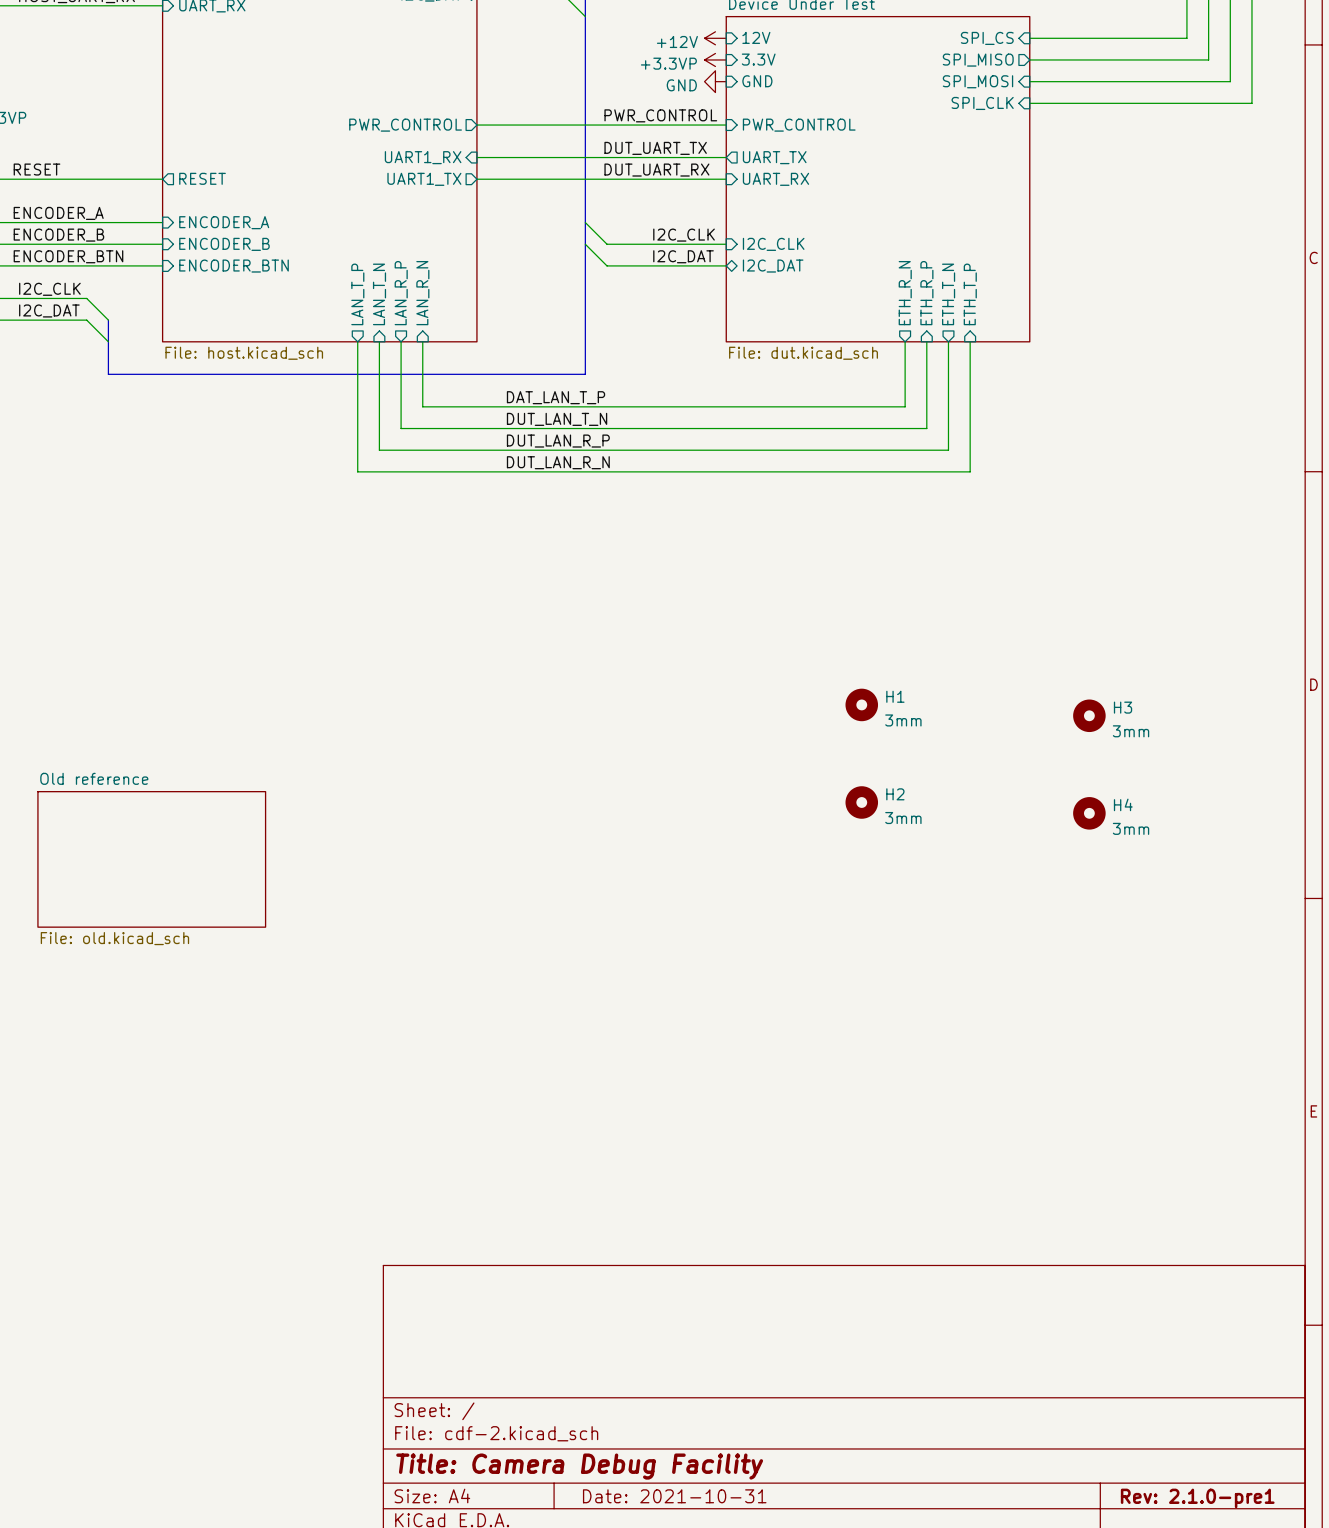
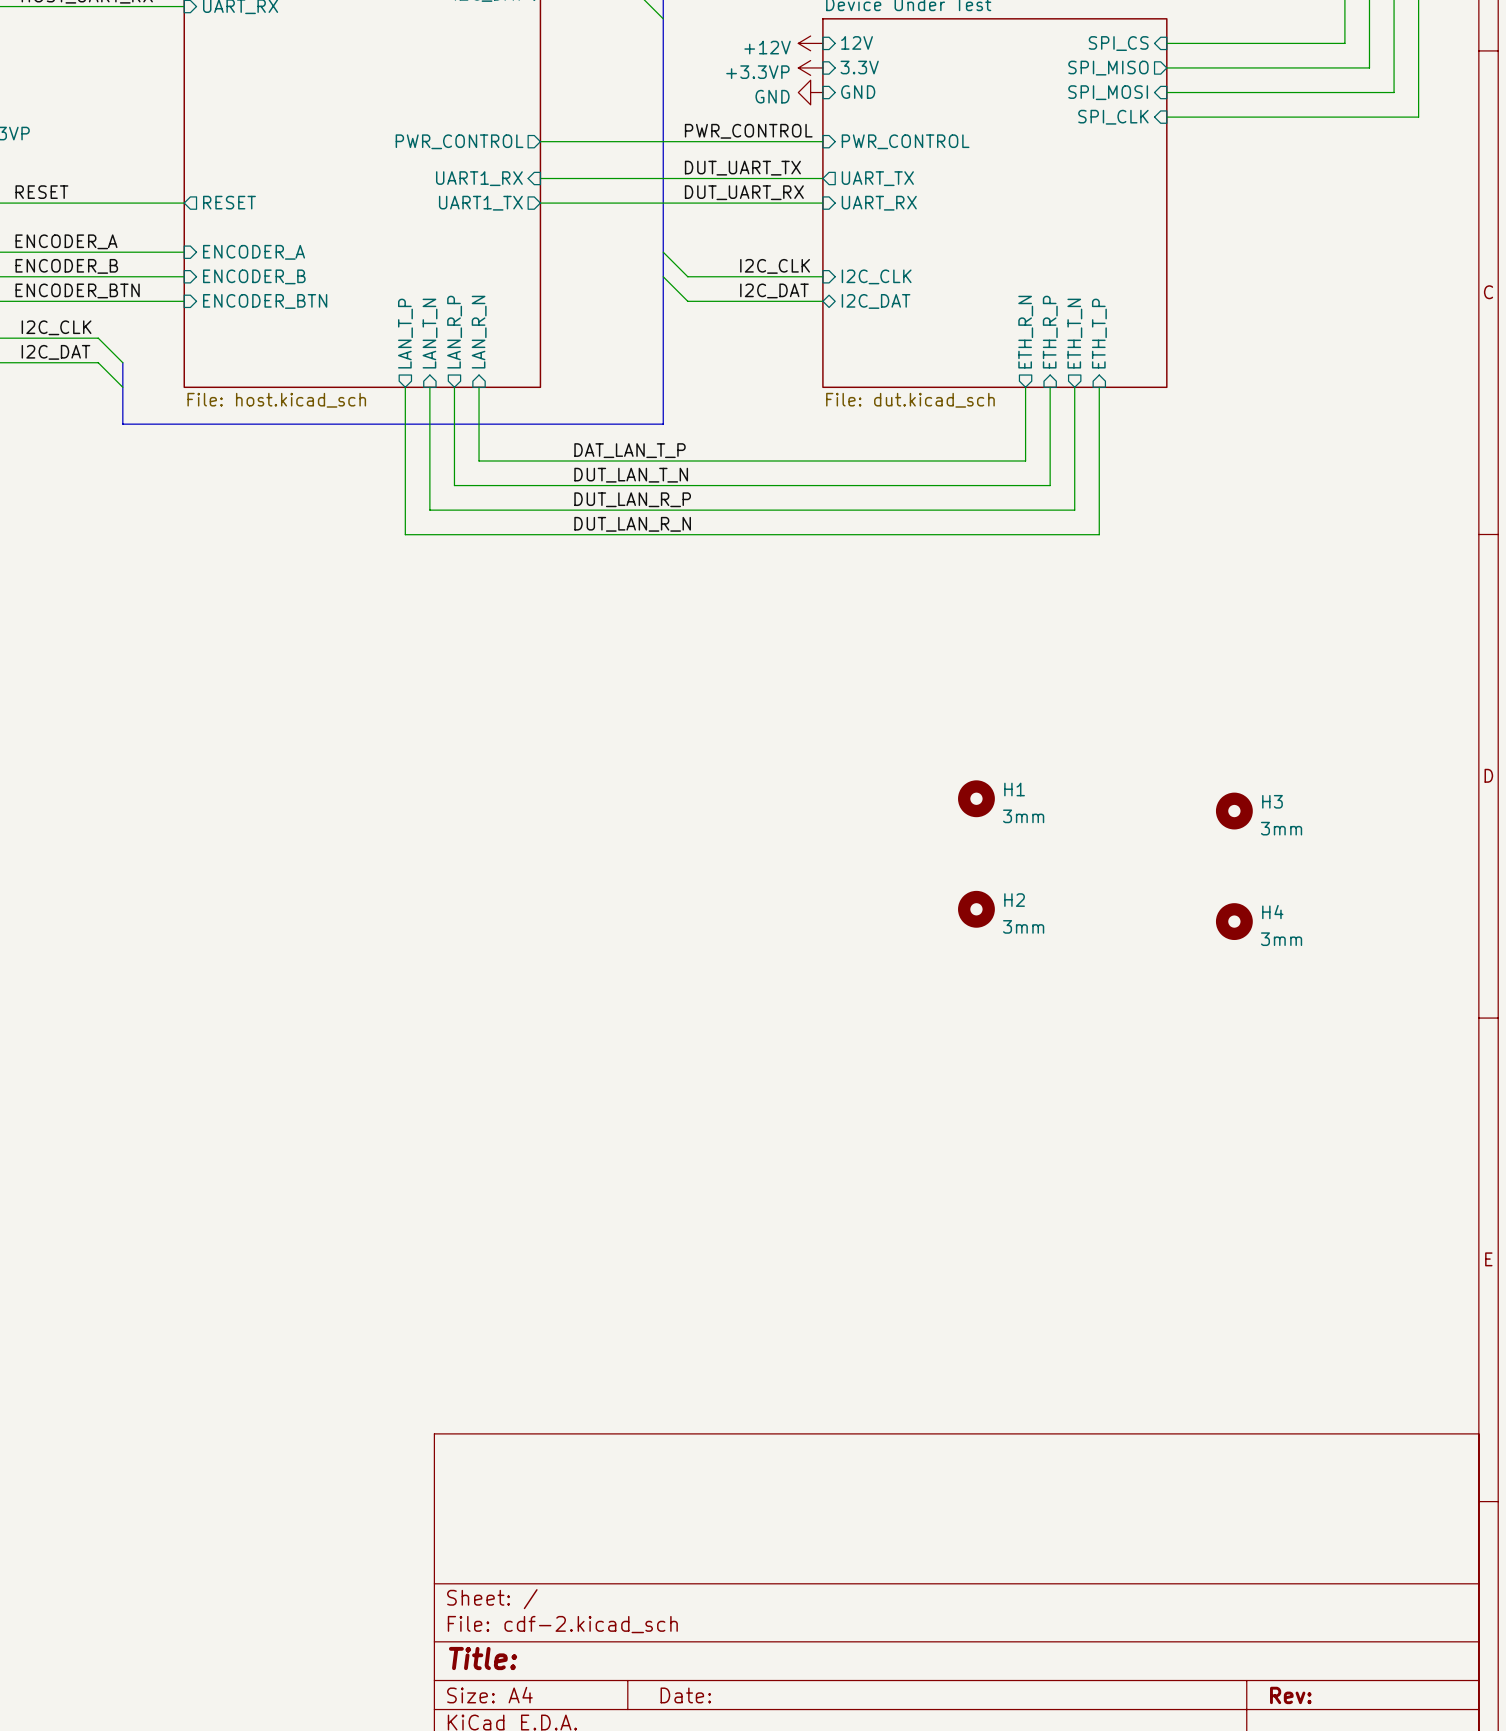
sheet Old reference: File: old.kicad_sch (151, 859) -> none
title block: Title: Camera Debug Facility (579, 1466) -> Title: (483, 1658)
title block: Date: 2021-10-31 (674, 1496) -> Date: (685, 1695)
title block: Rev: 2.1.0-pre1 (1197, 1498) -> Rev: (1290, 1695)

